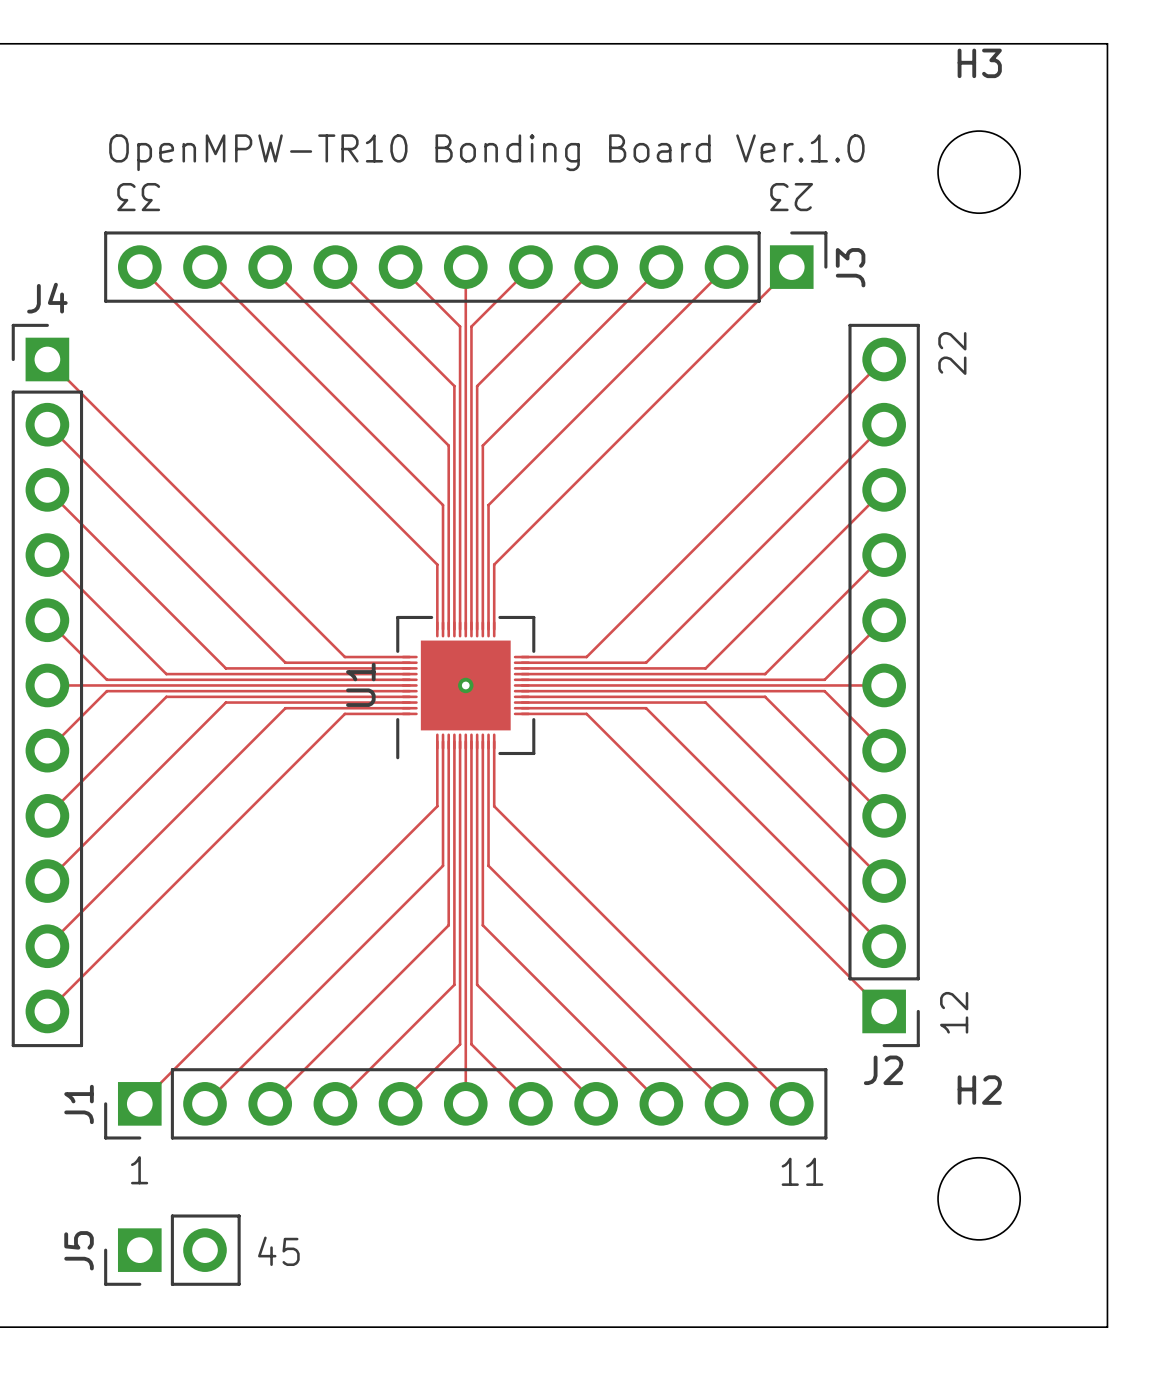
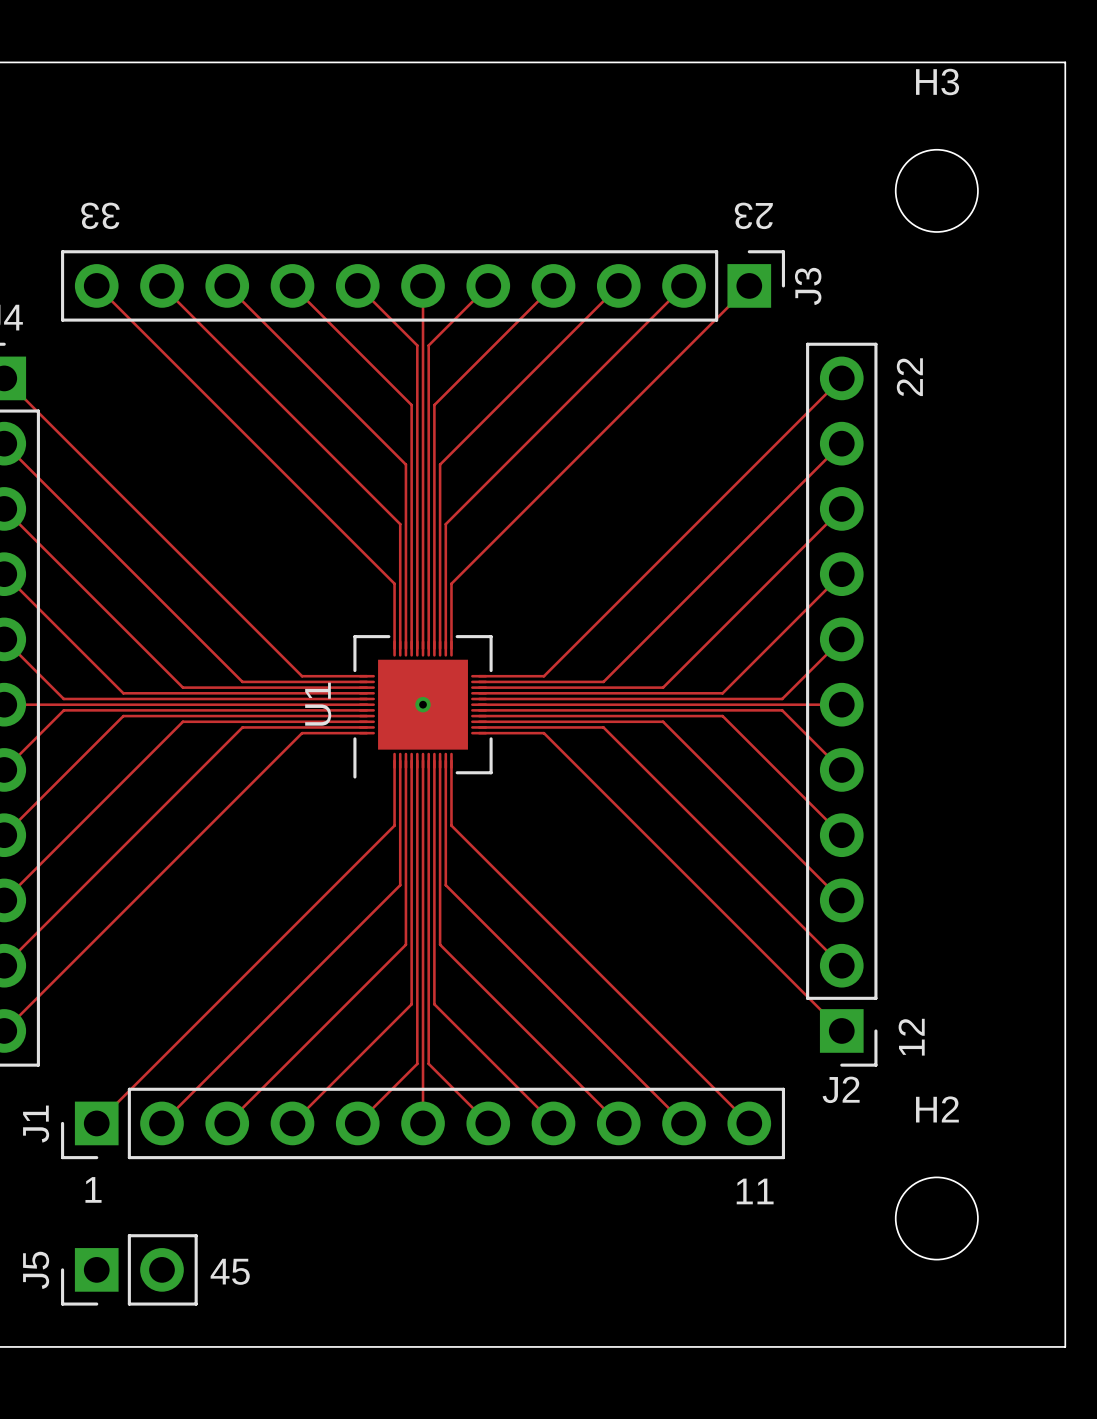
text: OpenMPW-TR10 Bonding Board Ver.1.0 (486, 152) -> none

